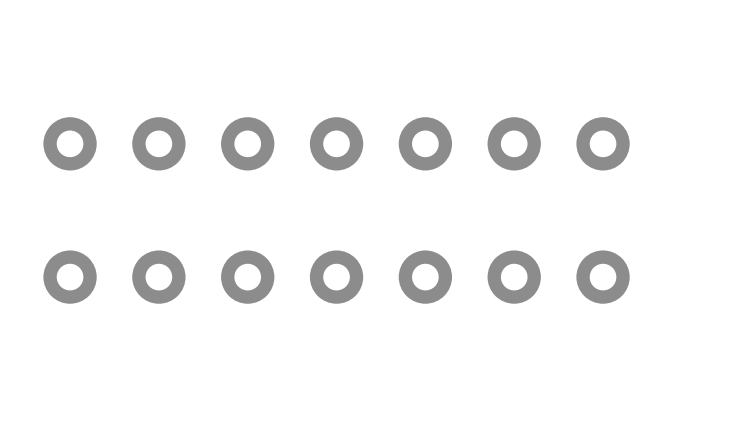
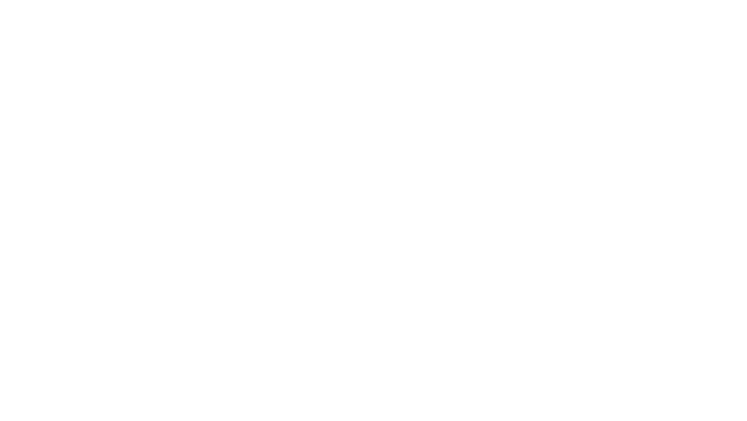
part: (336, 210) -> none

